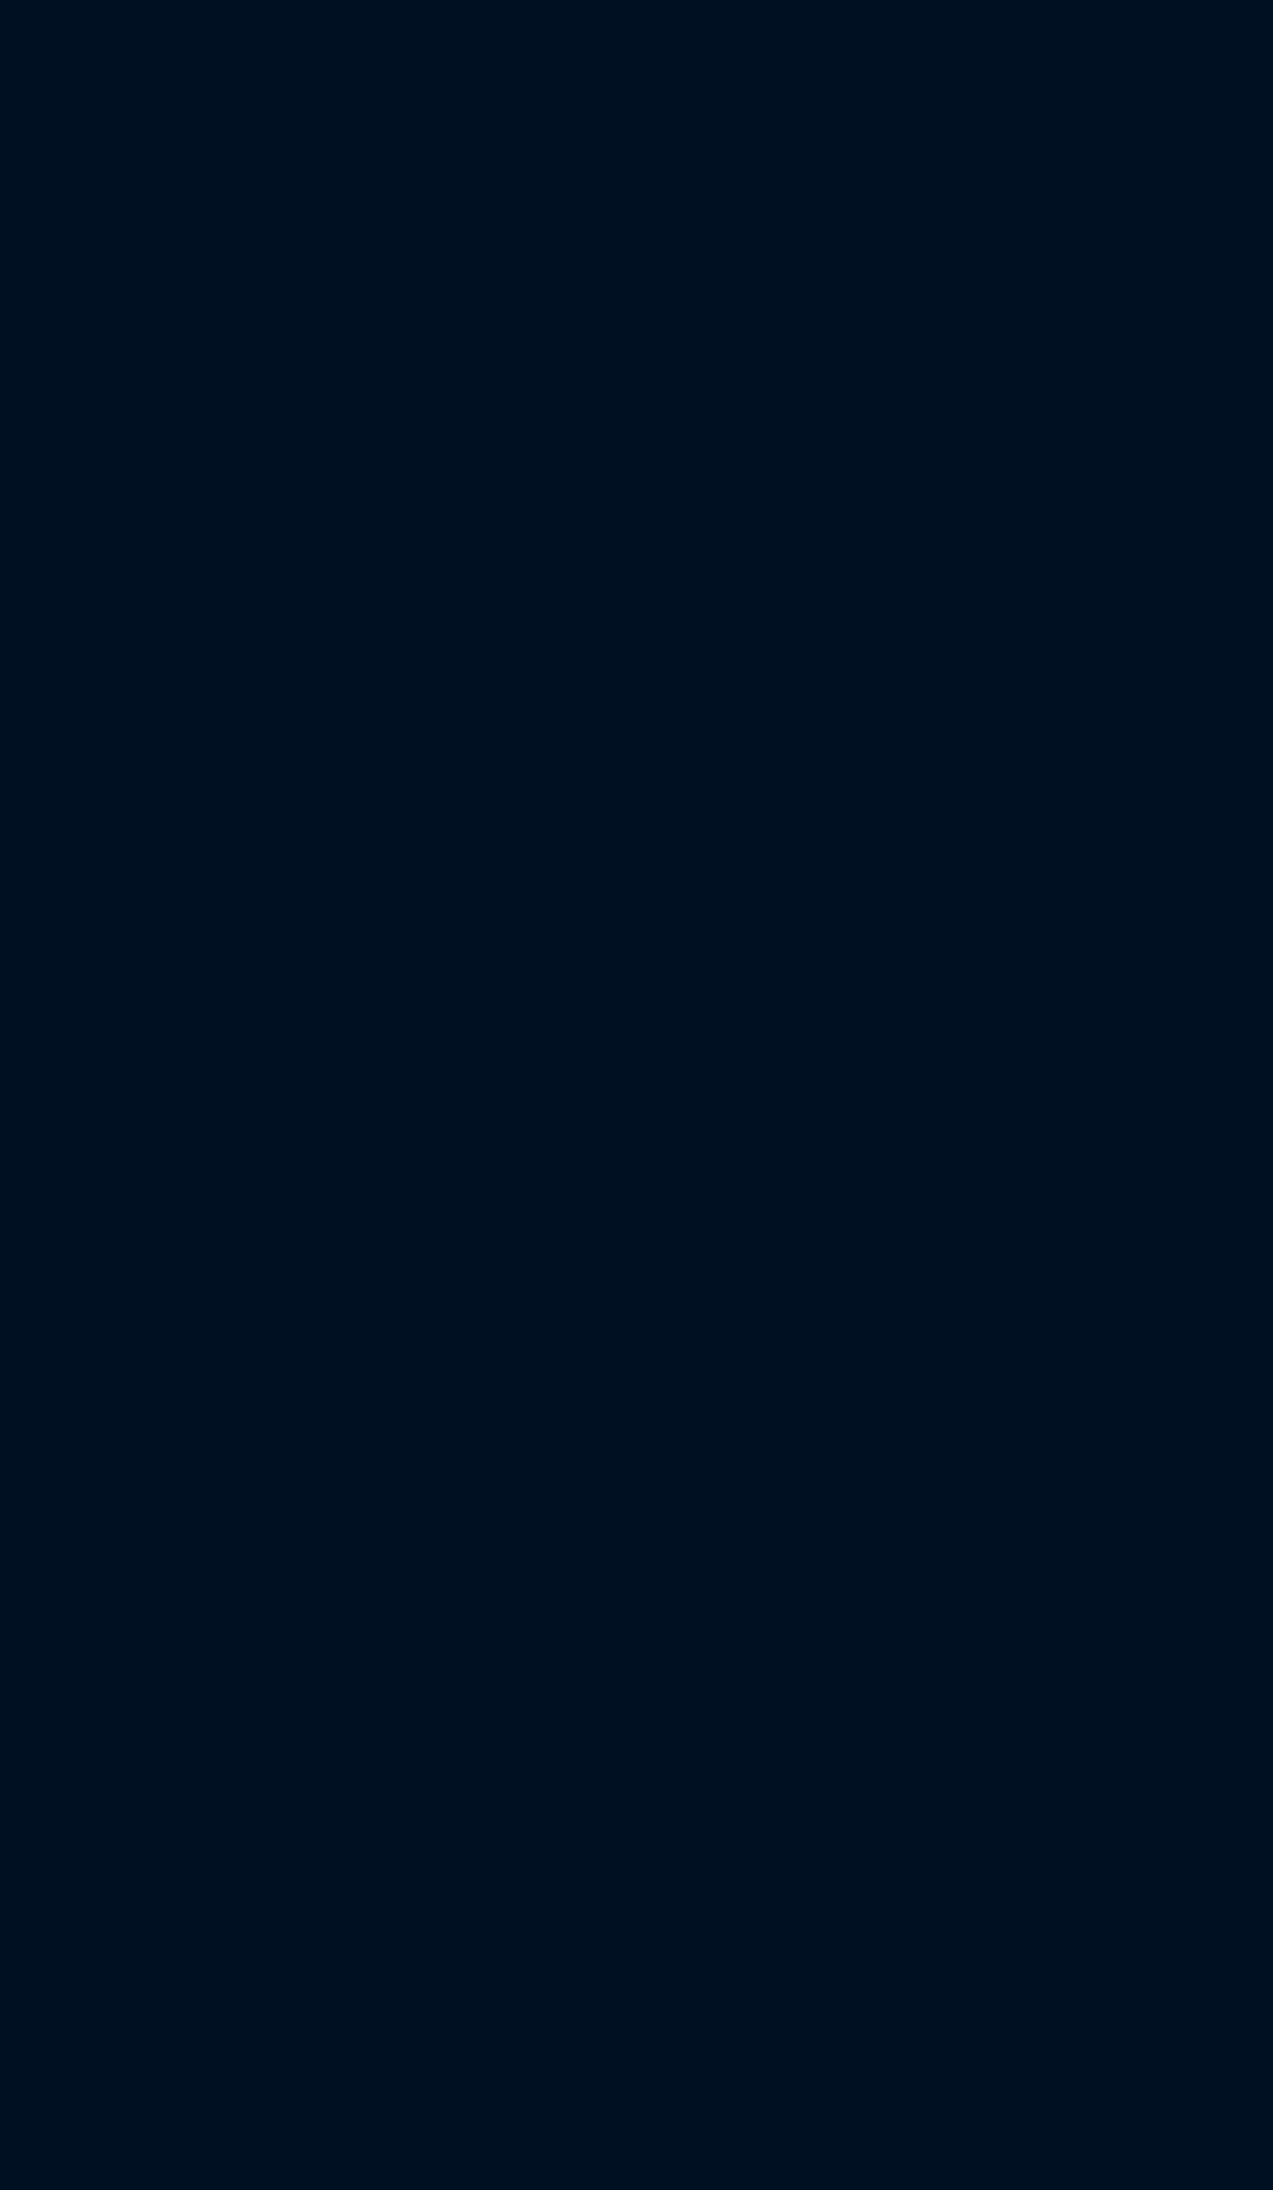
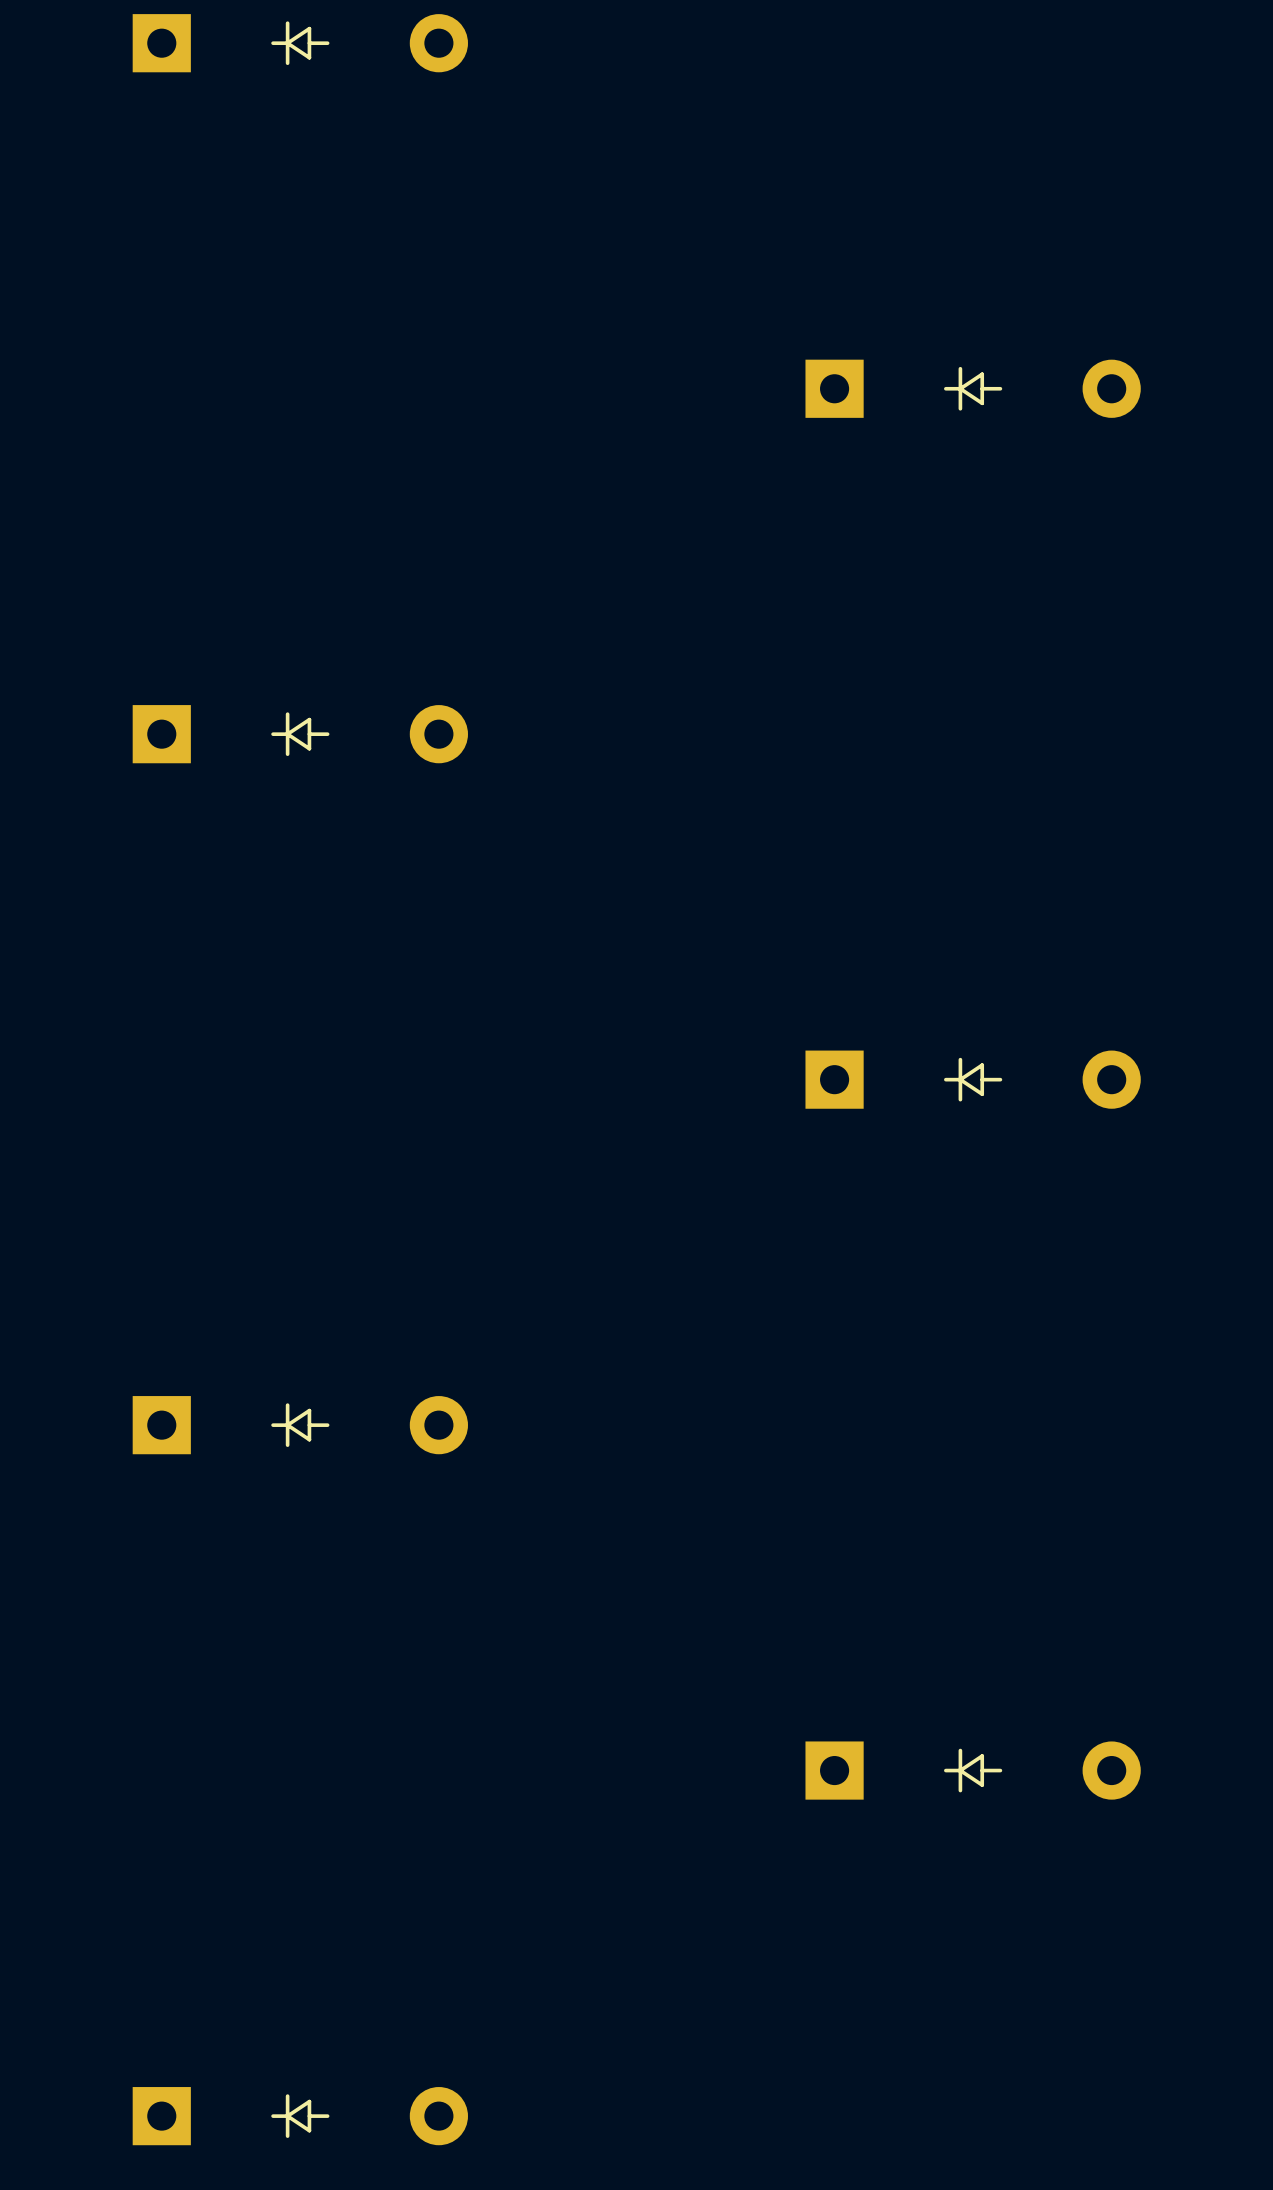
part: none -> (300, 43)
part: none -> (973, 388)
part: none -> (300, 734)
part: none -> (973, 1079)
part: none -> (300, 1425)
part: none -> (973, 1770)
part: none -> (300, 2116)

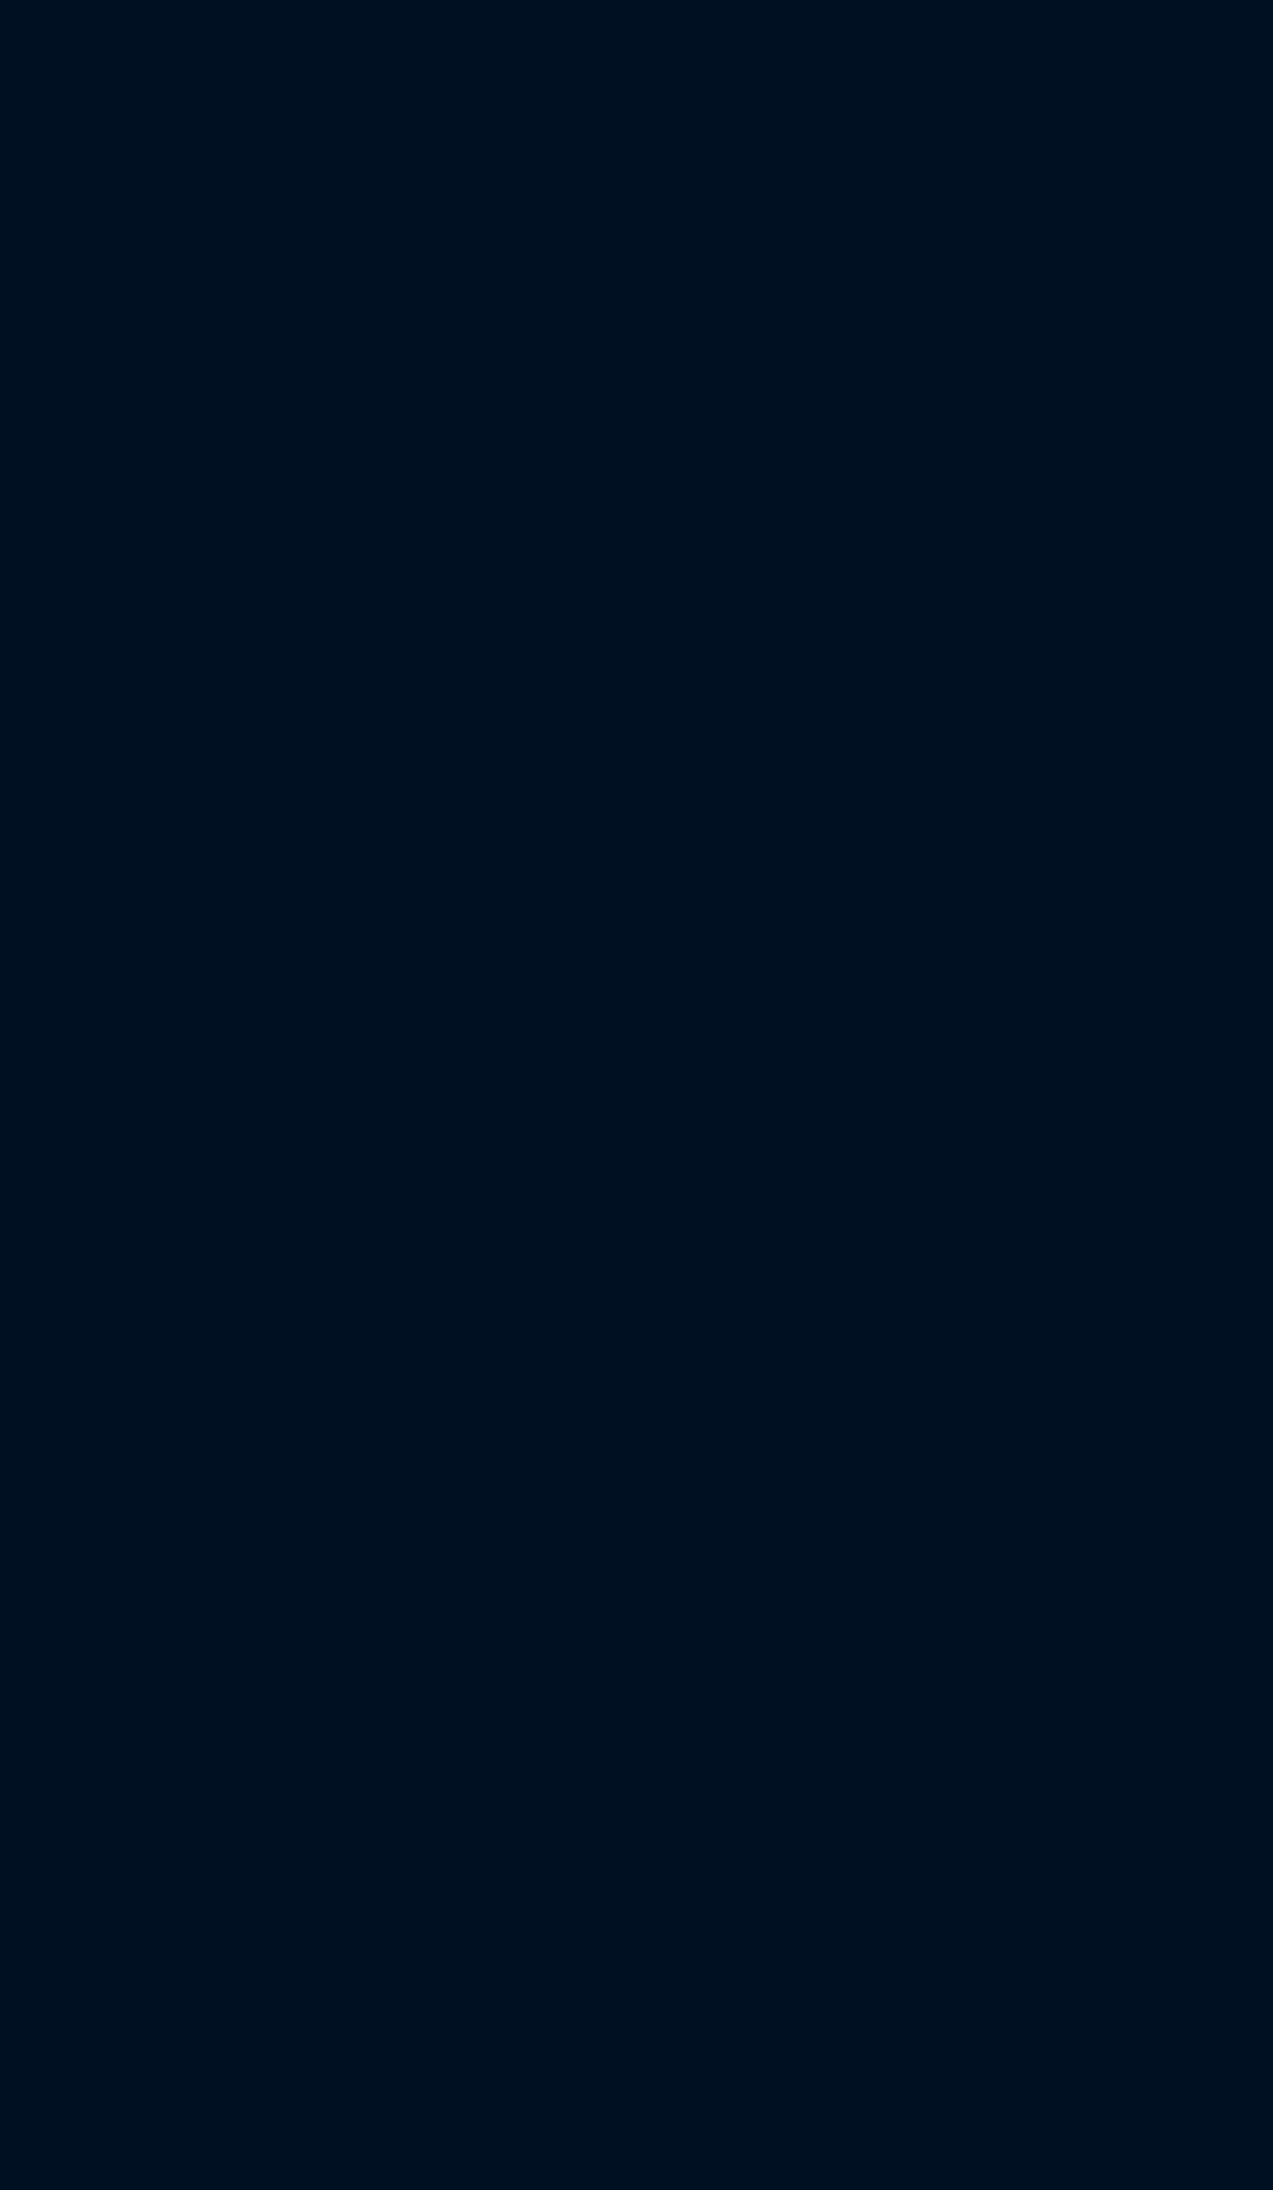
part: (300, 43) -> none
part: (973, 388) -> none
part: (300, 734) -> none
part: (973, 1079) -> none
part: (300, 1425) -> none
part: (973, 1770) -> none
part: (300, 2116) -> none

